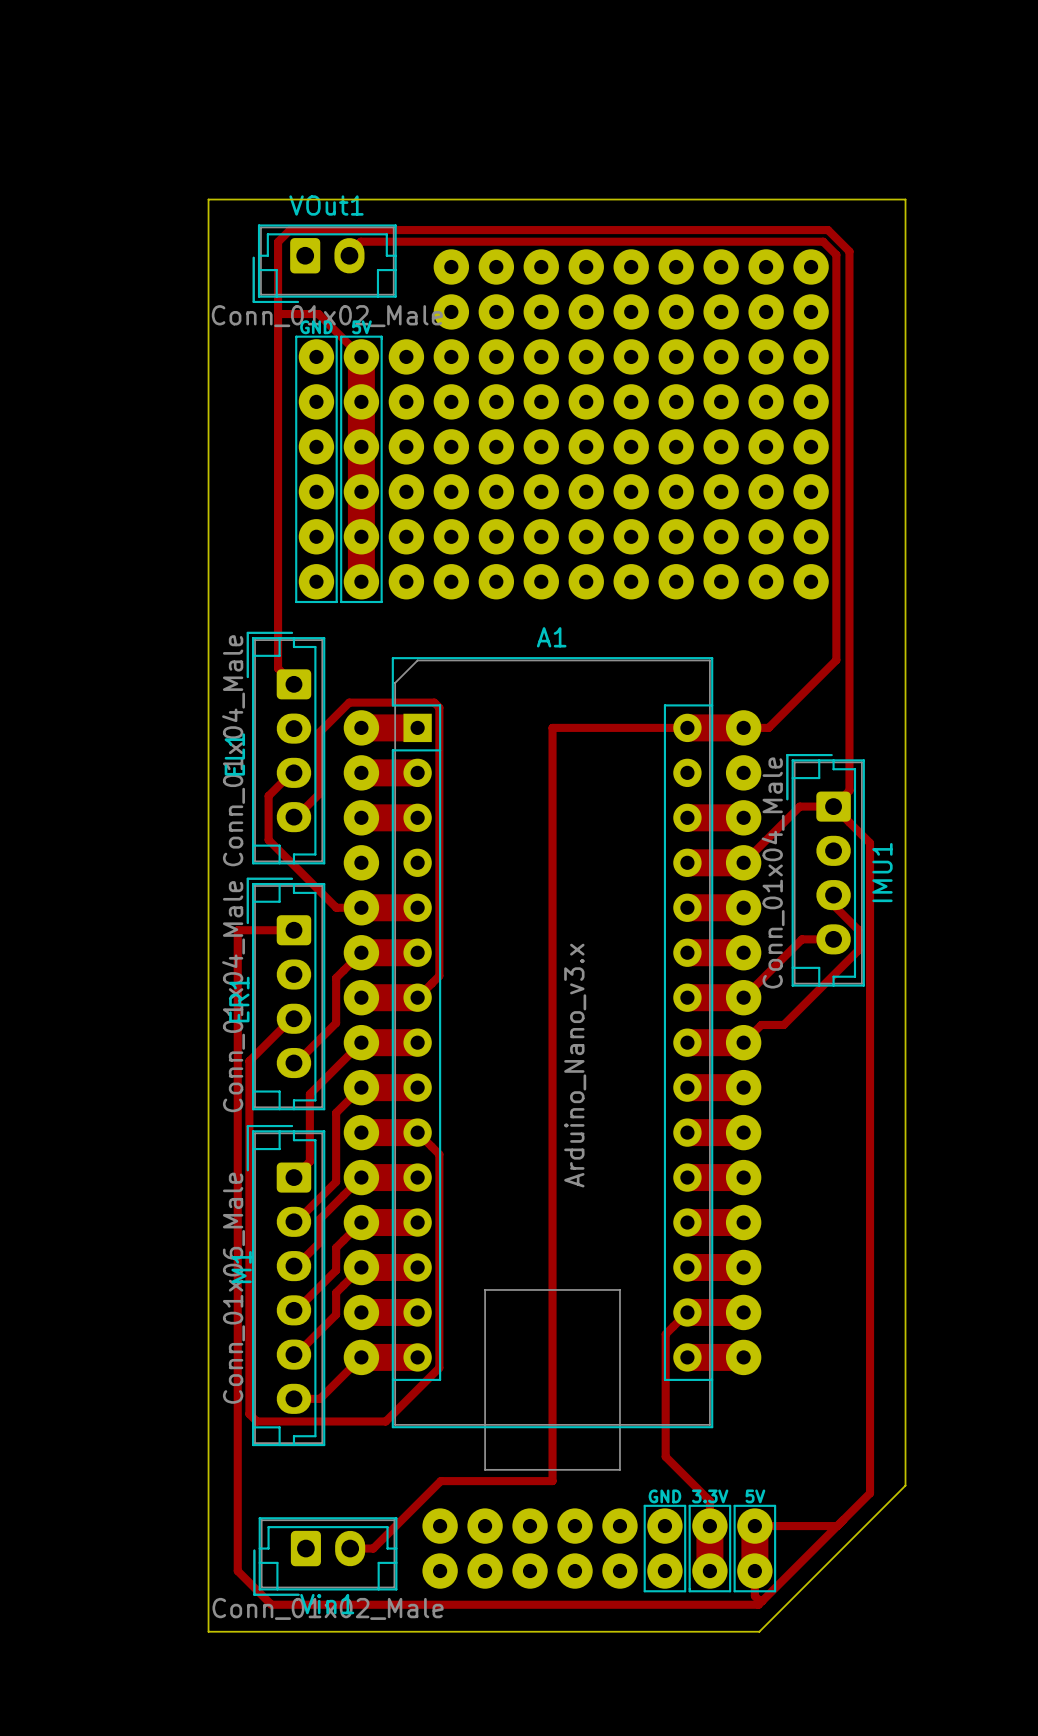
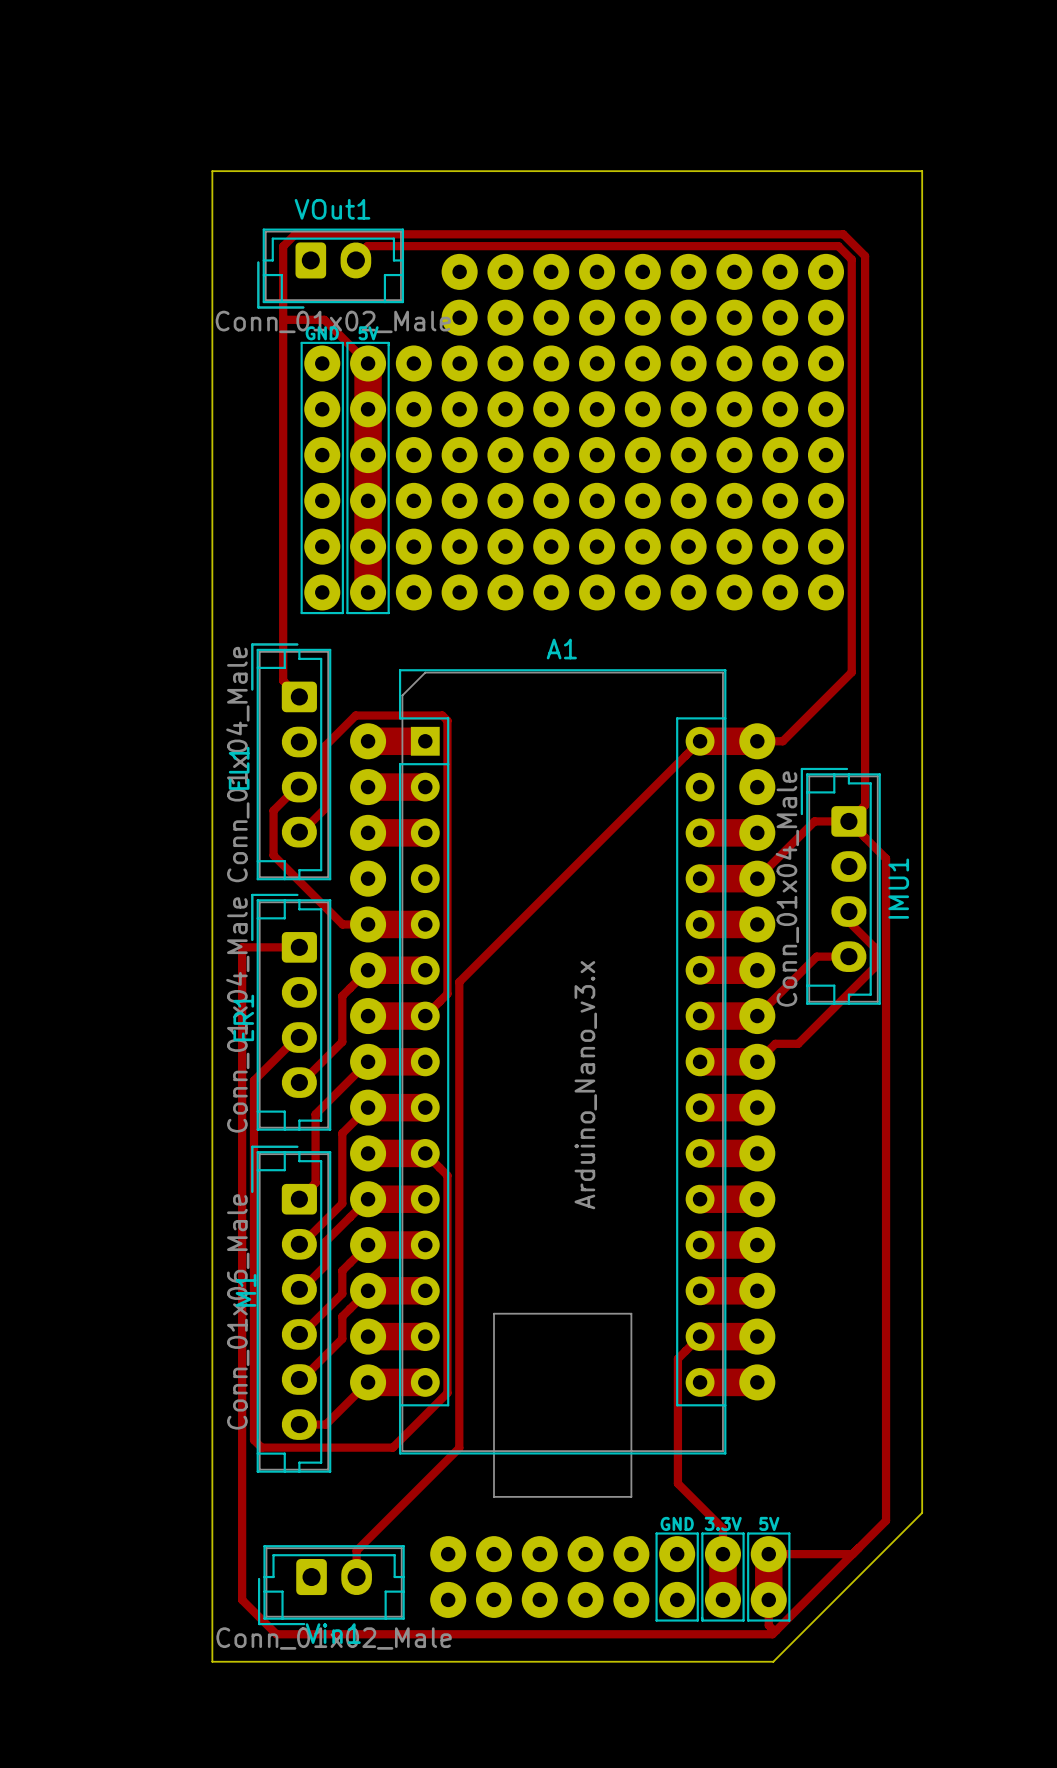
board edge: (208, 199) (905, 199) -> (212, 203) (212, 171) (922, 171) (922, 203)
track: (687, 727) (552, 727) (552, 1481) (440, 1481) (373, 1548) (350, 1548) -> (700, 741) (459, 982) (459, 1448) (356, 1550) (356, 1577)

